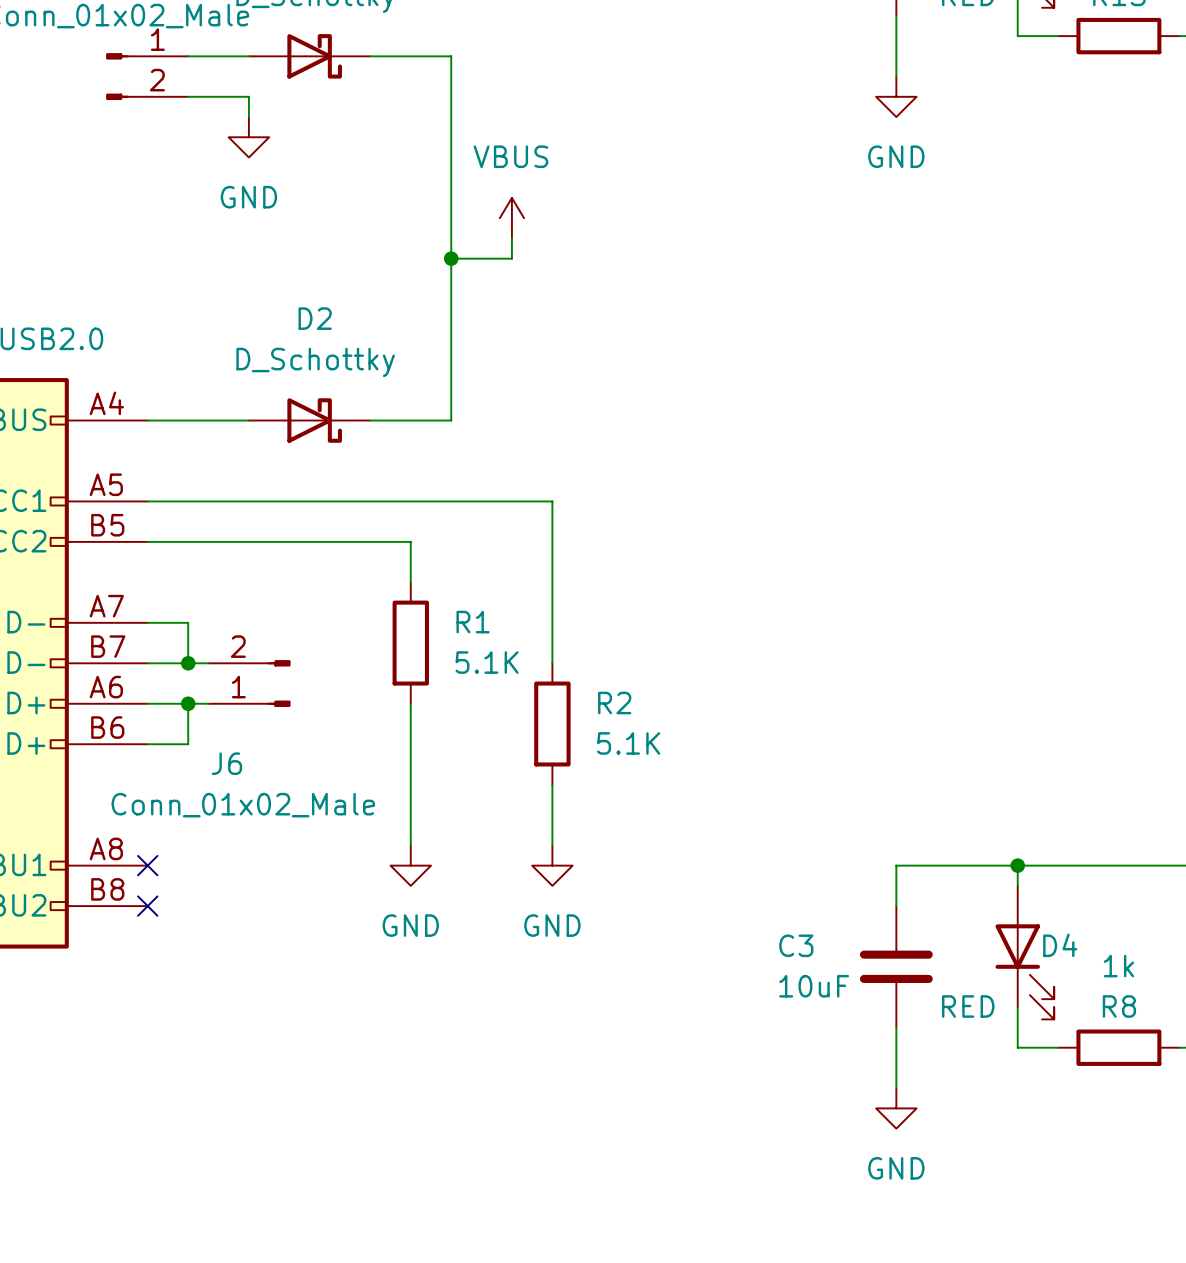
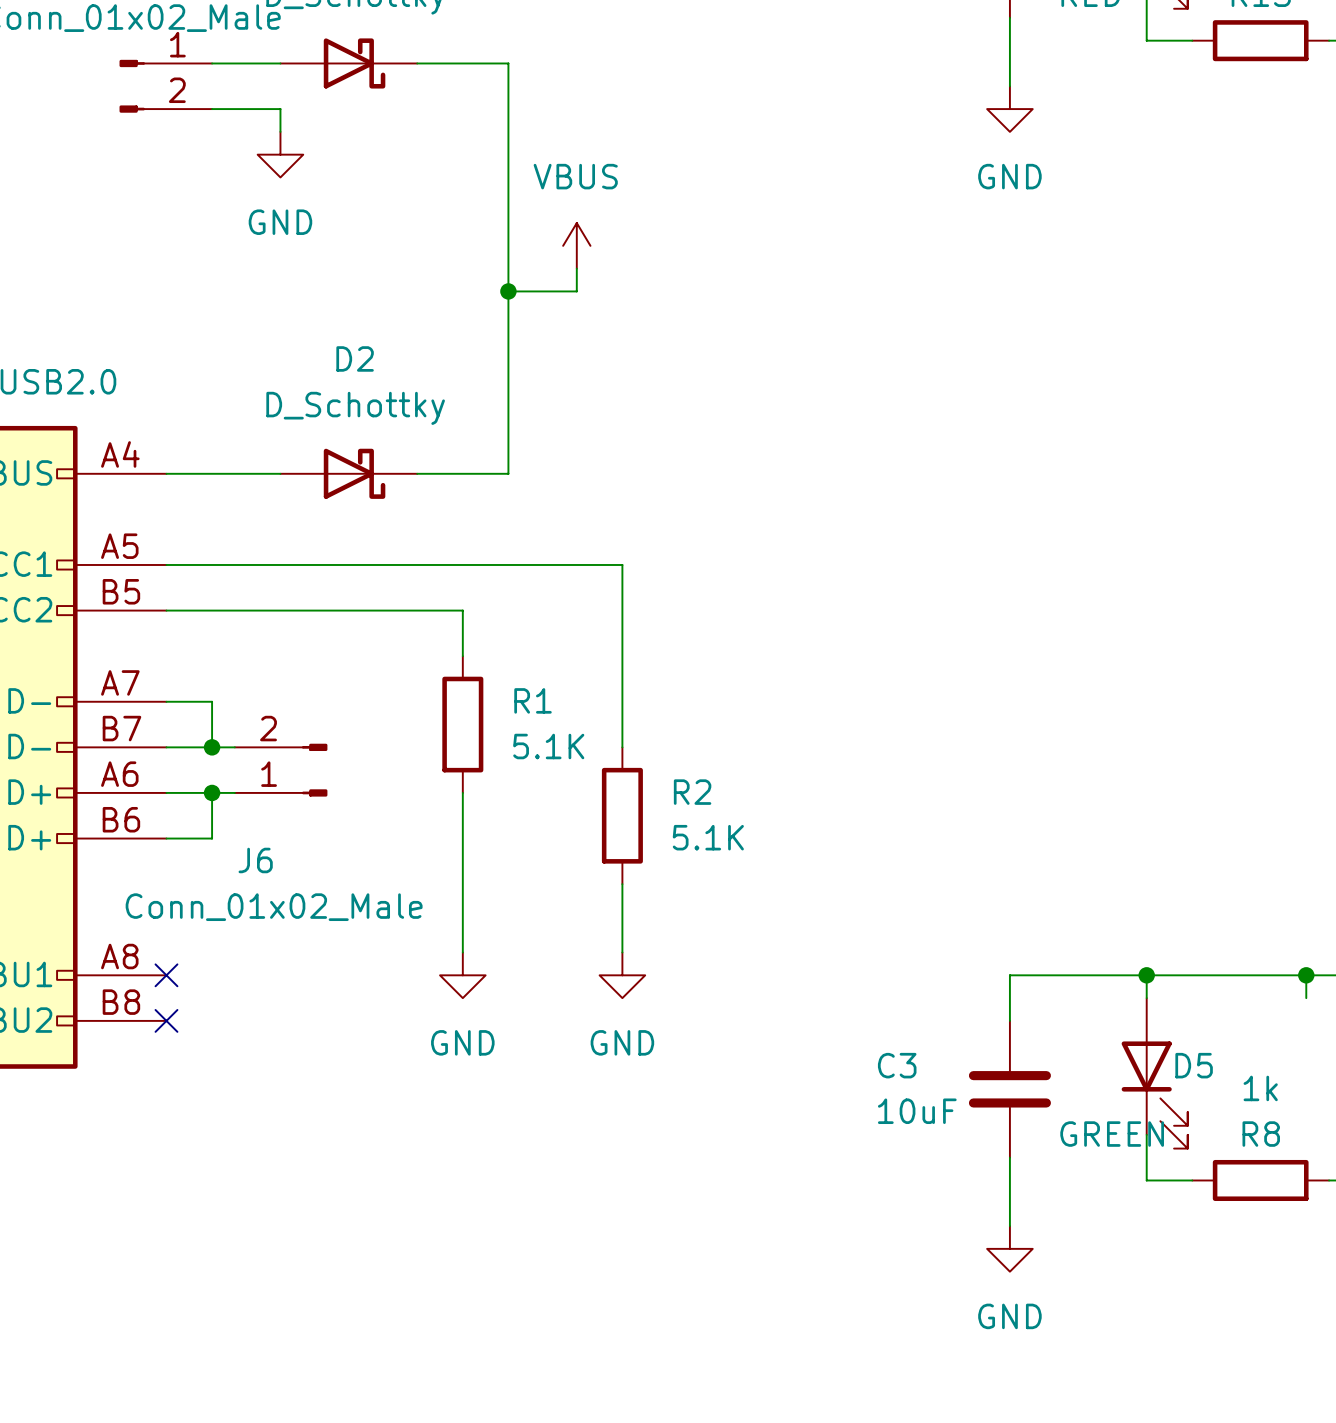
wire: none -> (1306, 975) (1306, 998)
junction: none -> (1306, 975)
D4 name: D4 (1060, 945) -> D5 (1194, 1065)
D4 value: RED (968, 1006) -> GREEN (1112, 1134)

